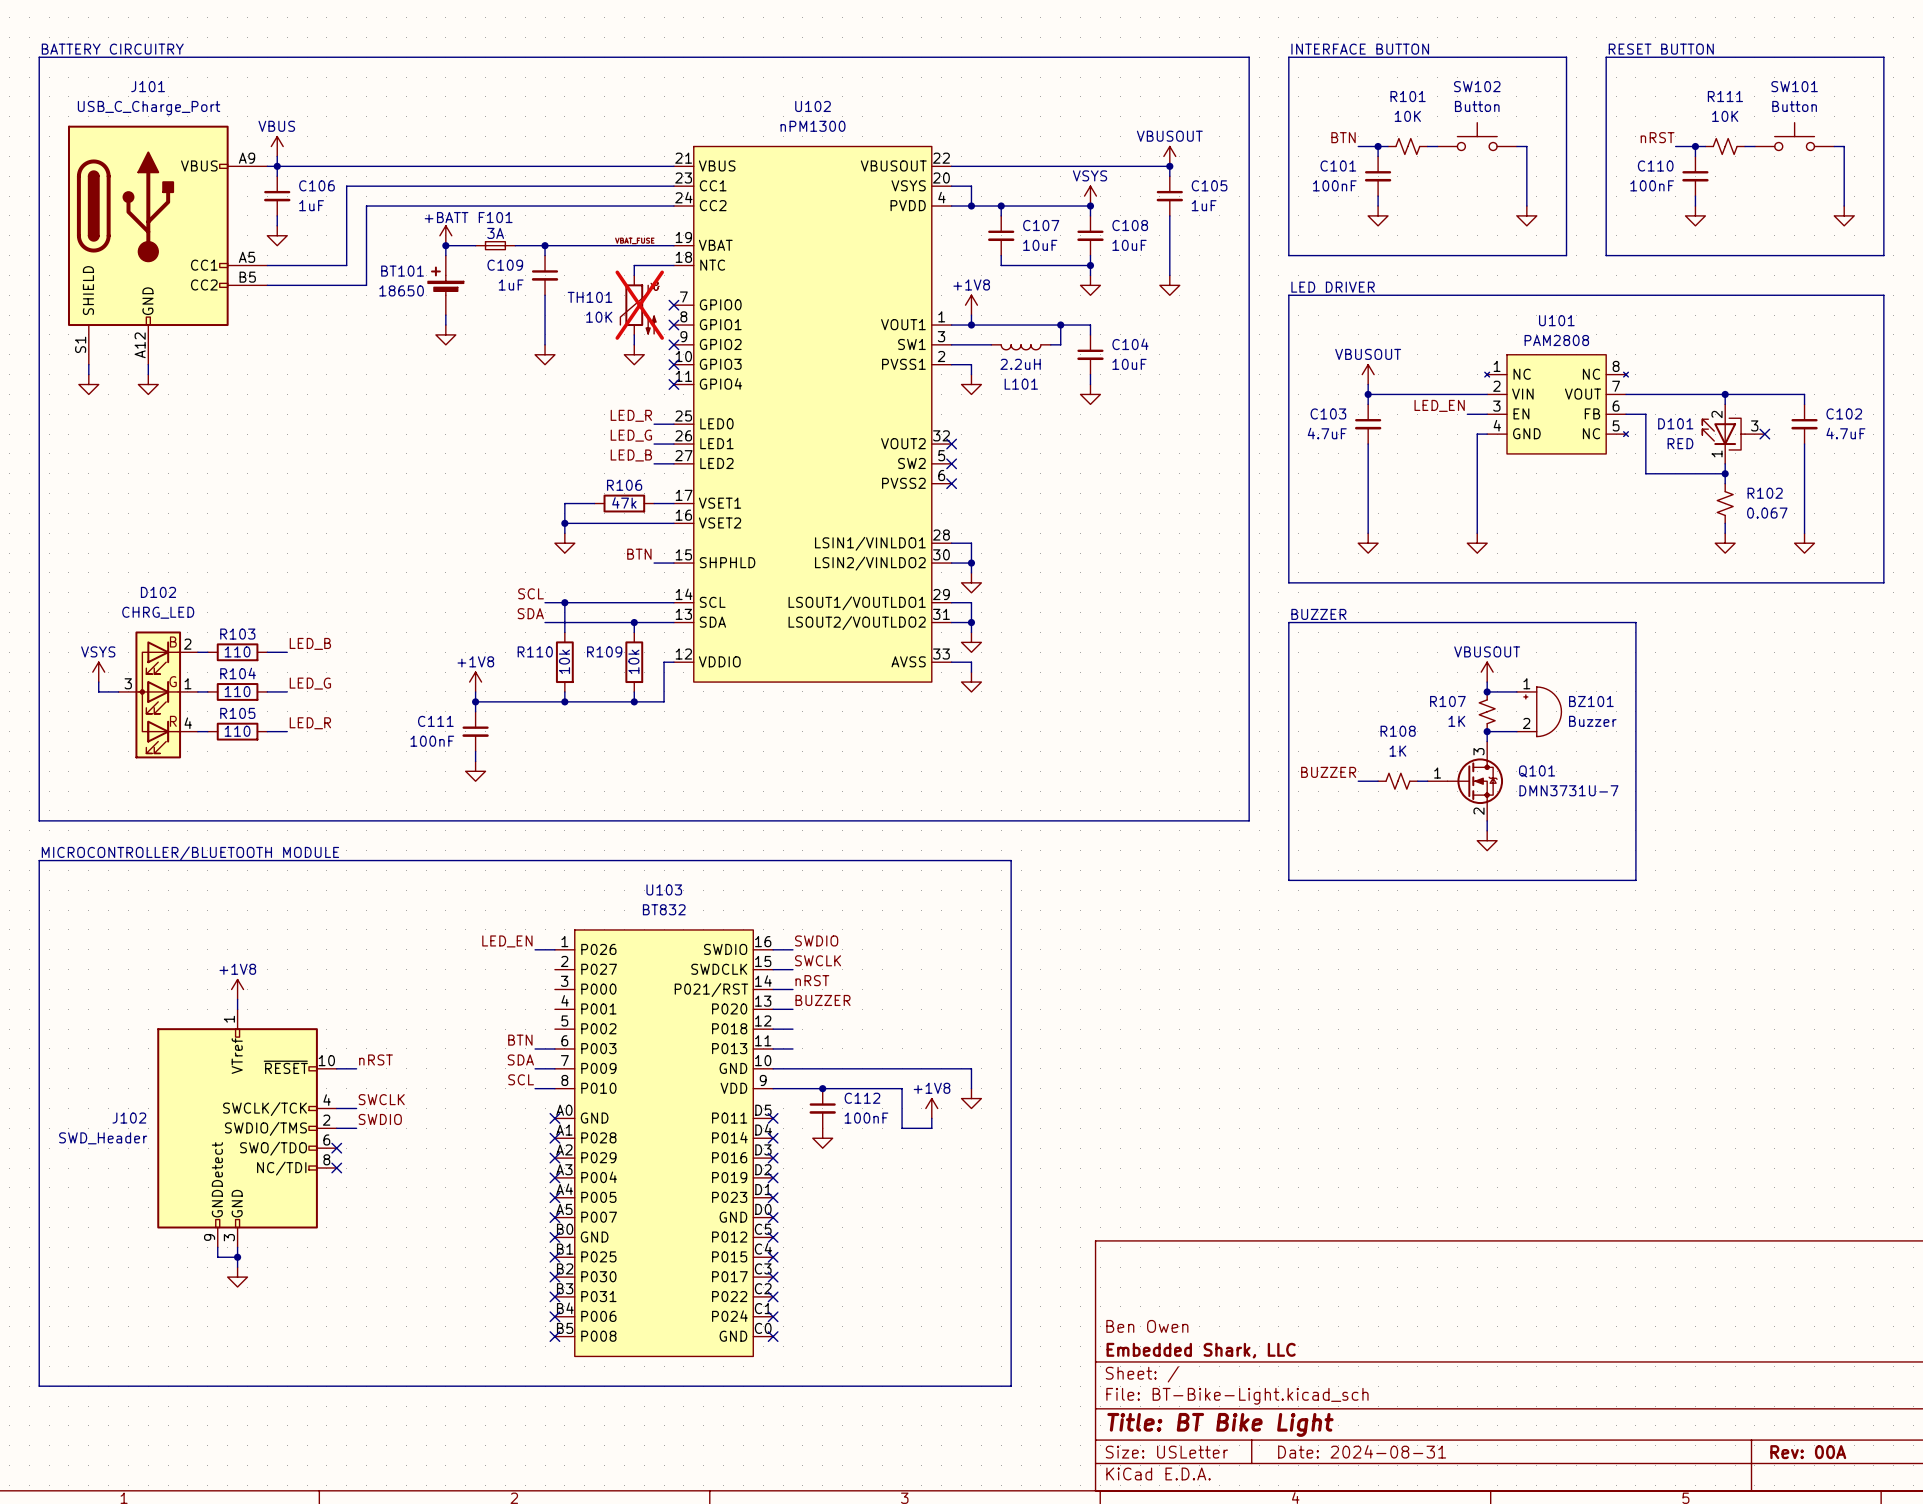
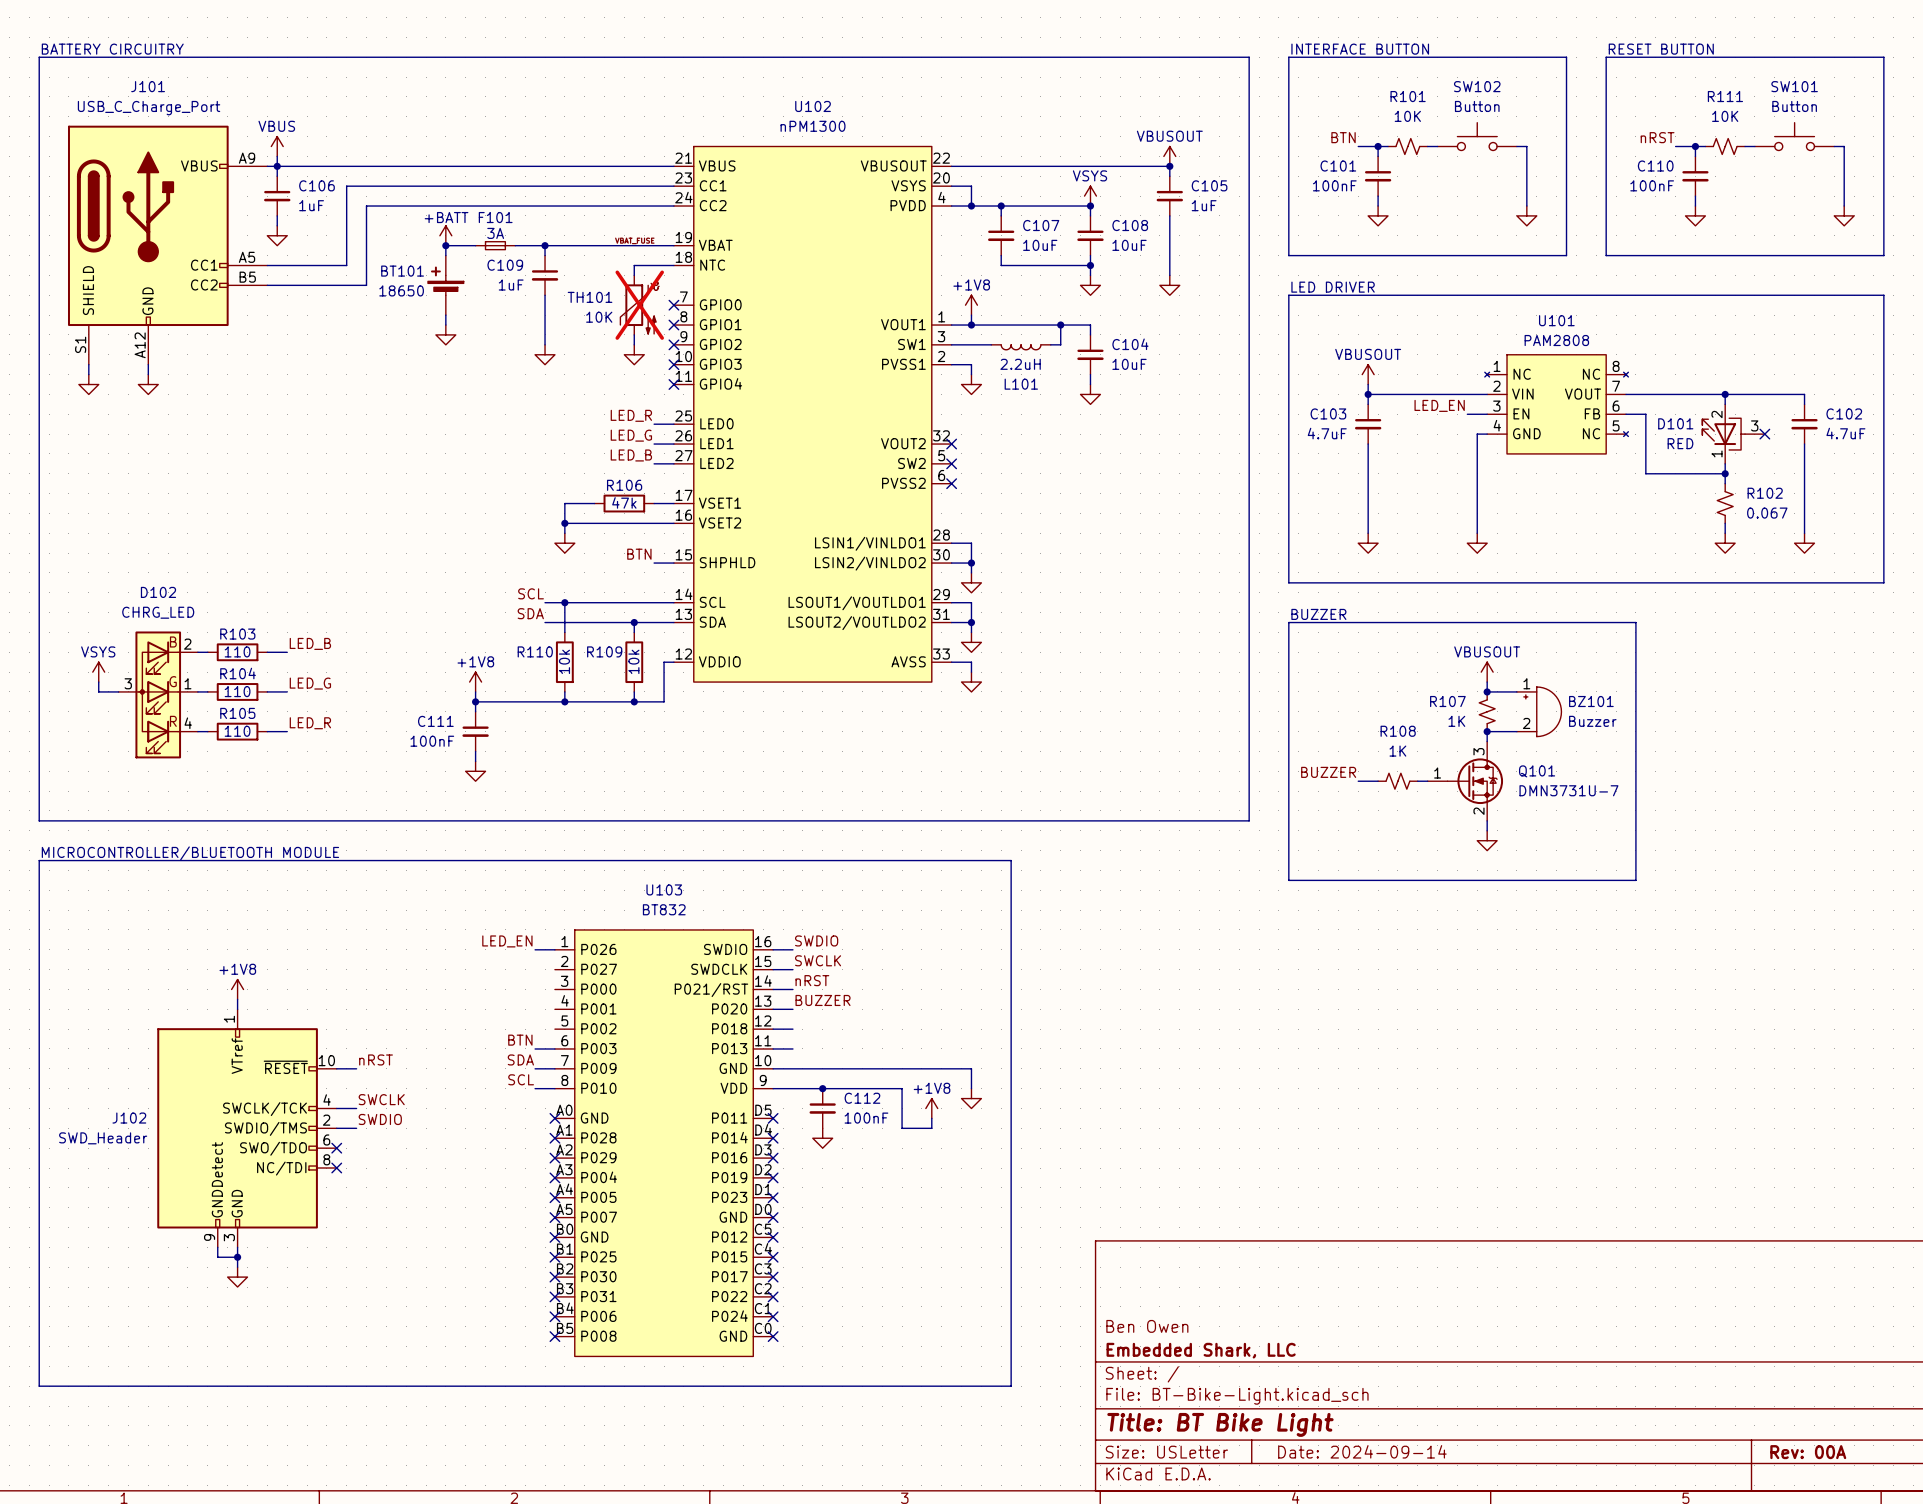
title block: Date: 2024-08-31 (1362, 1451) -> Date: 2024-09-14 (1362, 1451)

